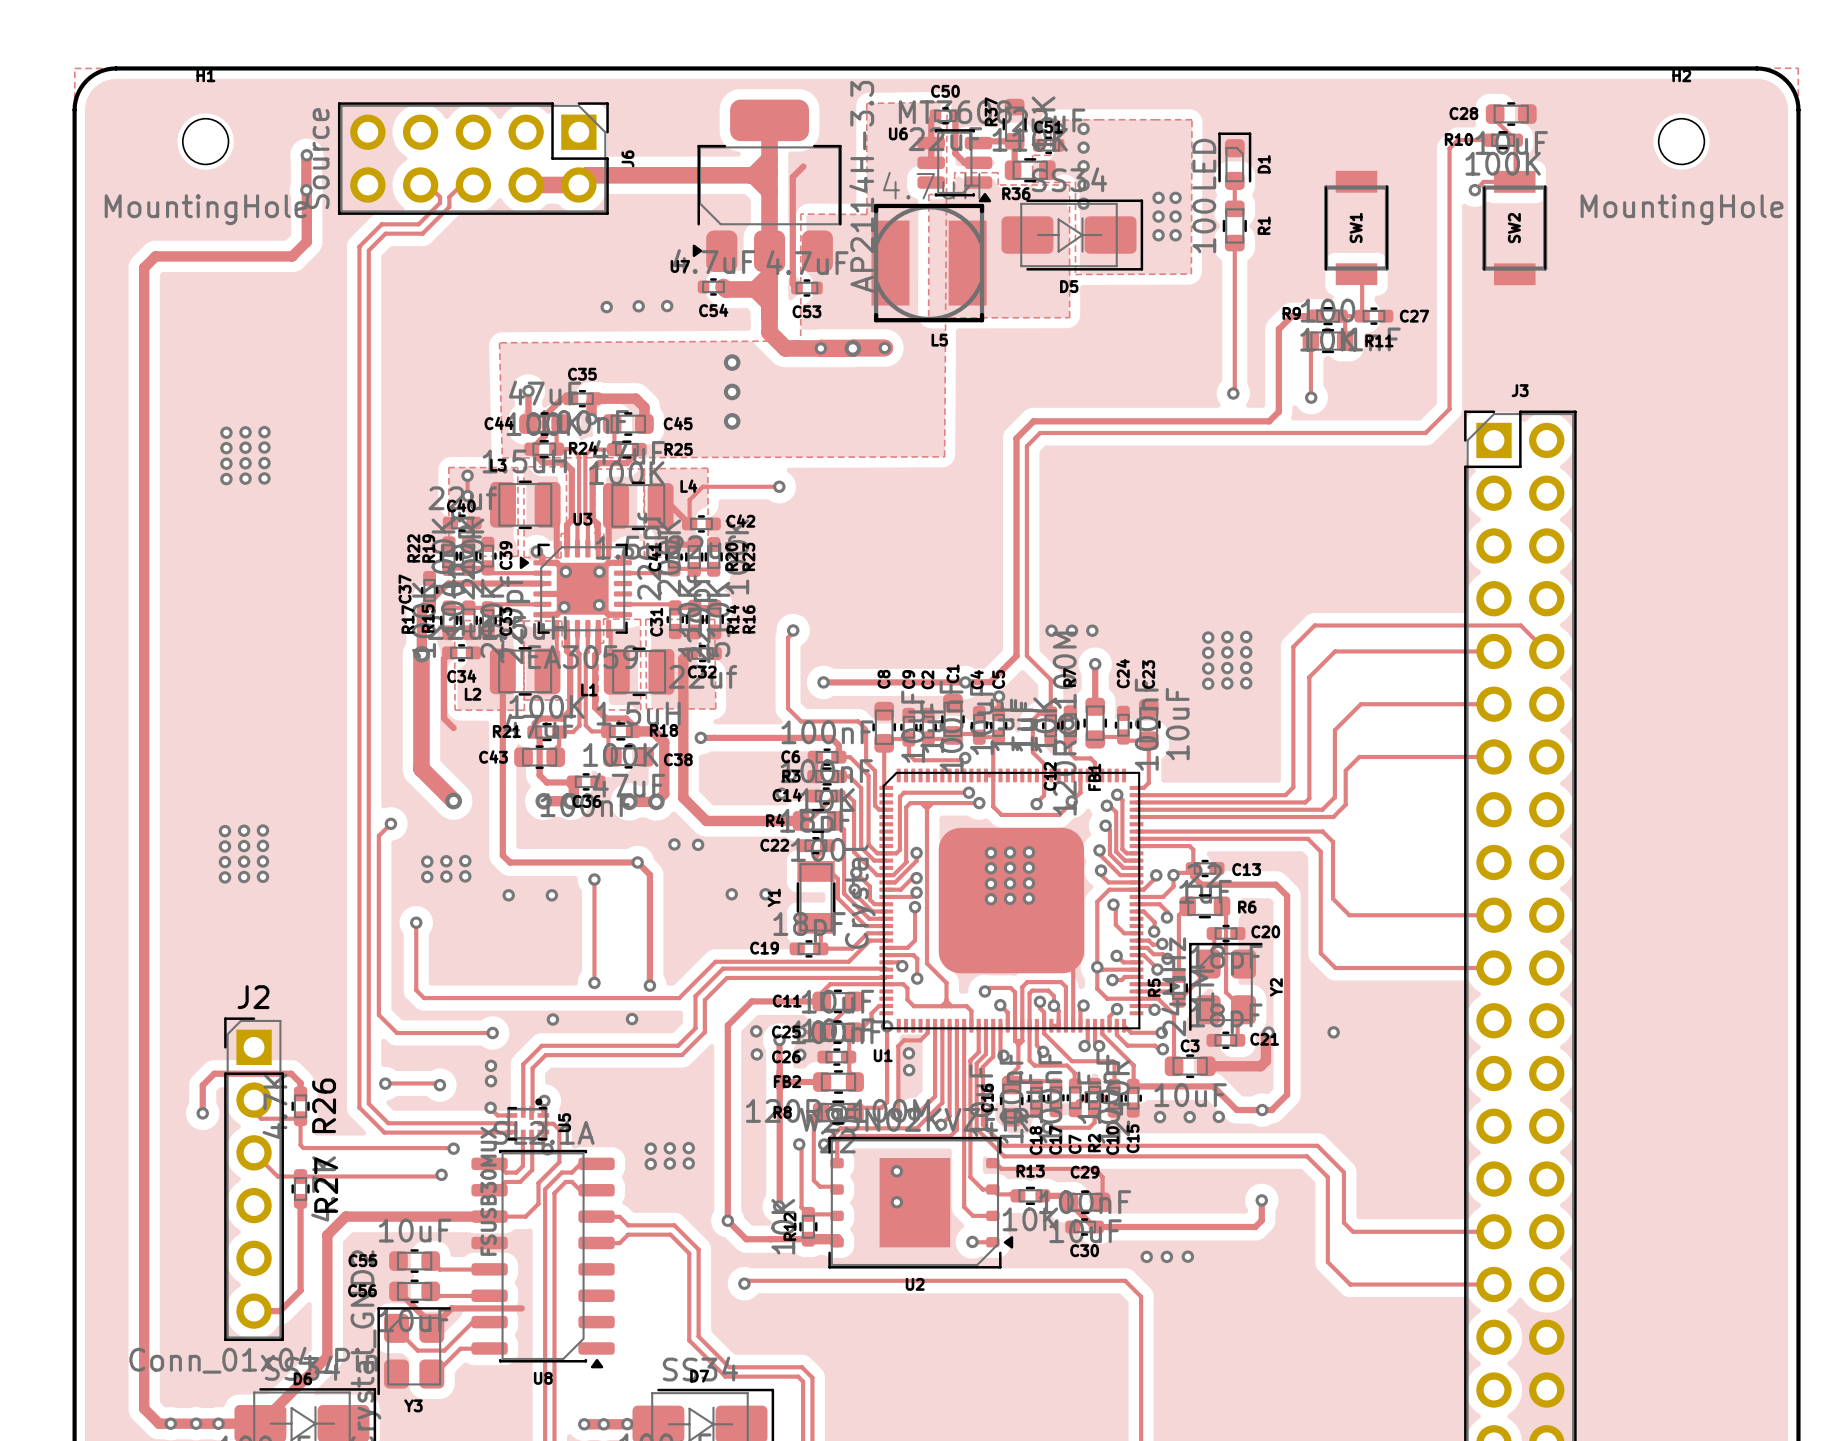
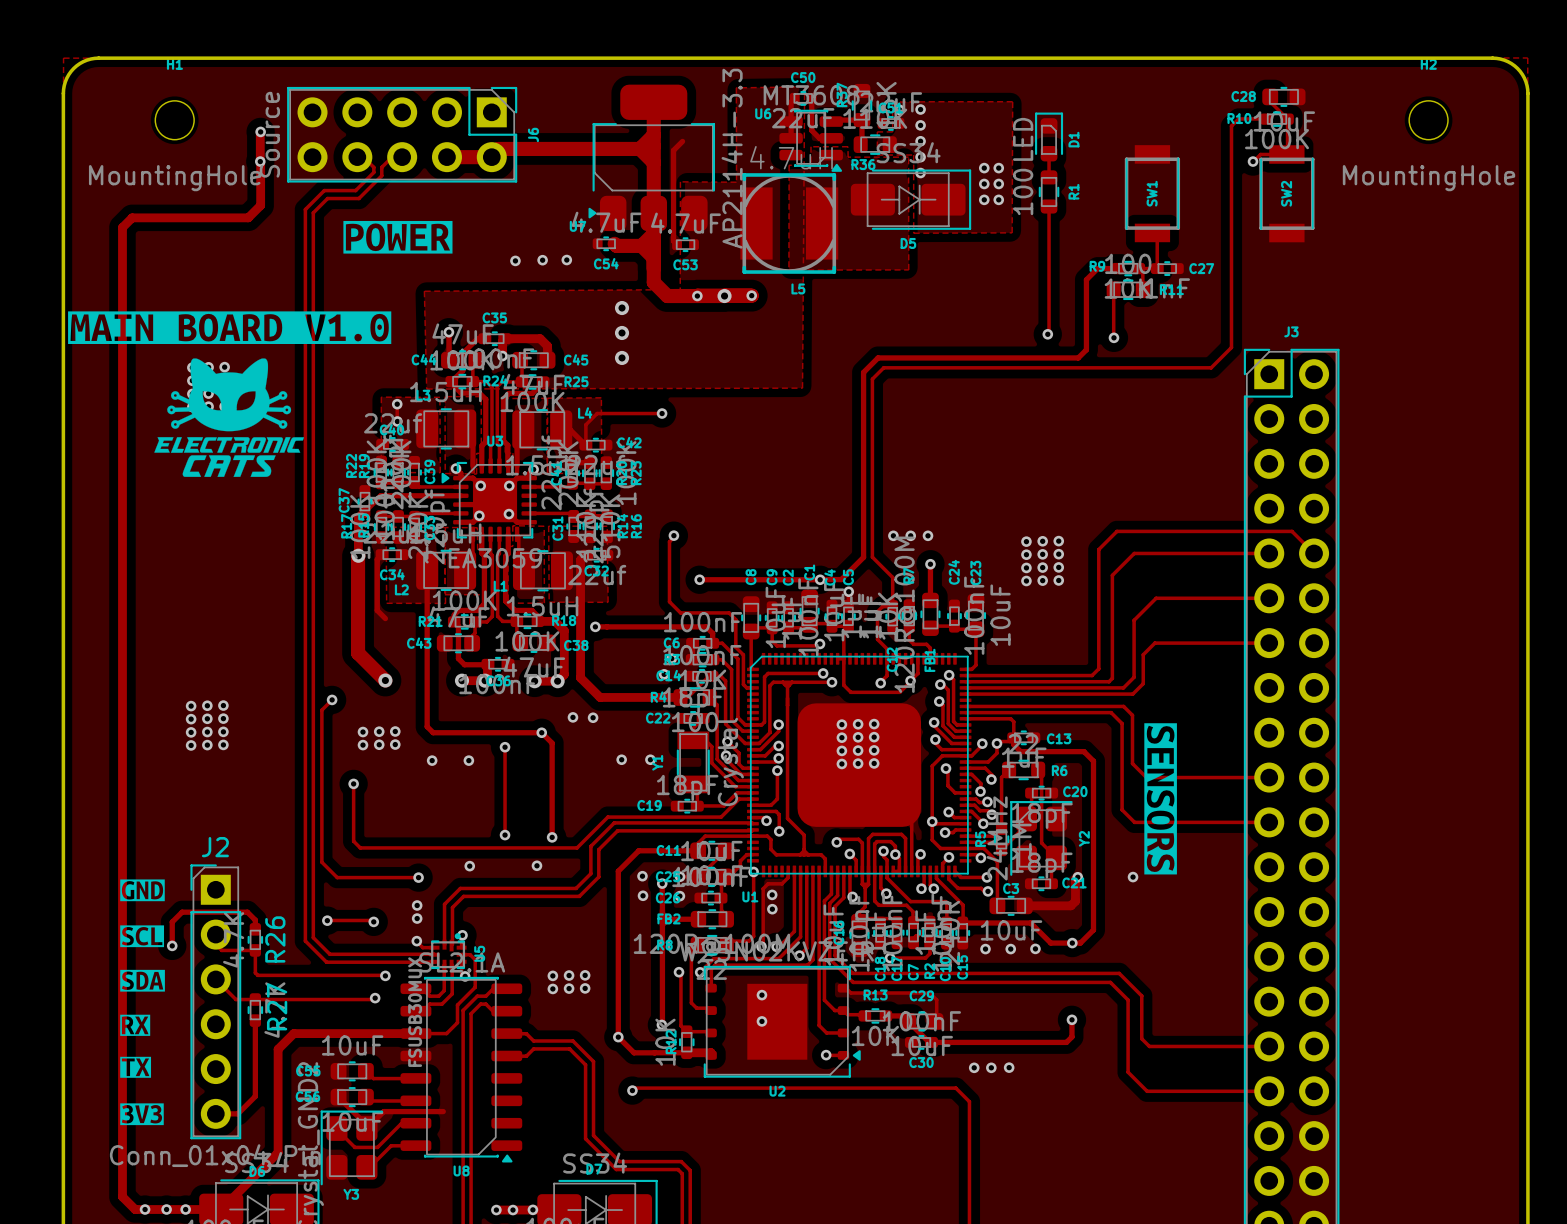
drawing: none -> [343, 220, 453, 254]
drawing: none -> [68, 311, 392, 477]
drawing: none -> [1144, 723, 1177, 875]
drawing: none -> [120, 879, 165, 902]
drawing: none -> [120, 925, 165, 948]
drawing: none -> [120, 969, 165, 992]
drawing: none -> [120, 1014, 152, 1078]
drawing: none -> [120, 1103, 164, 1126]

